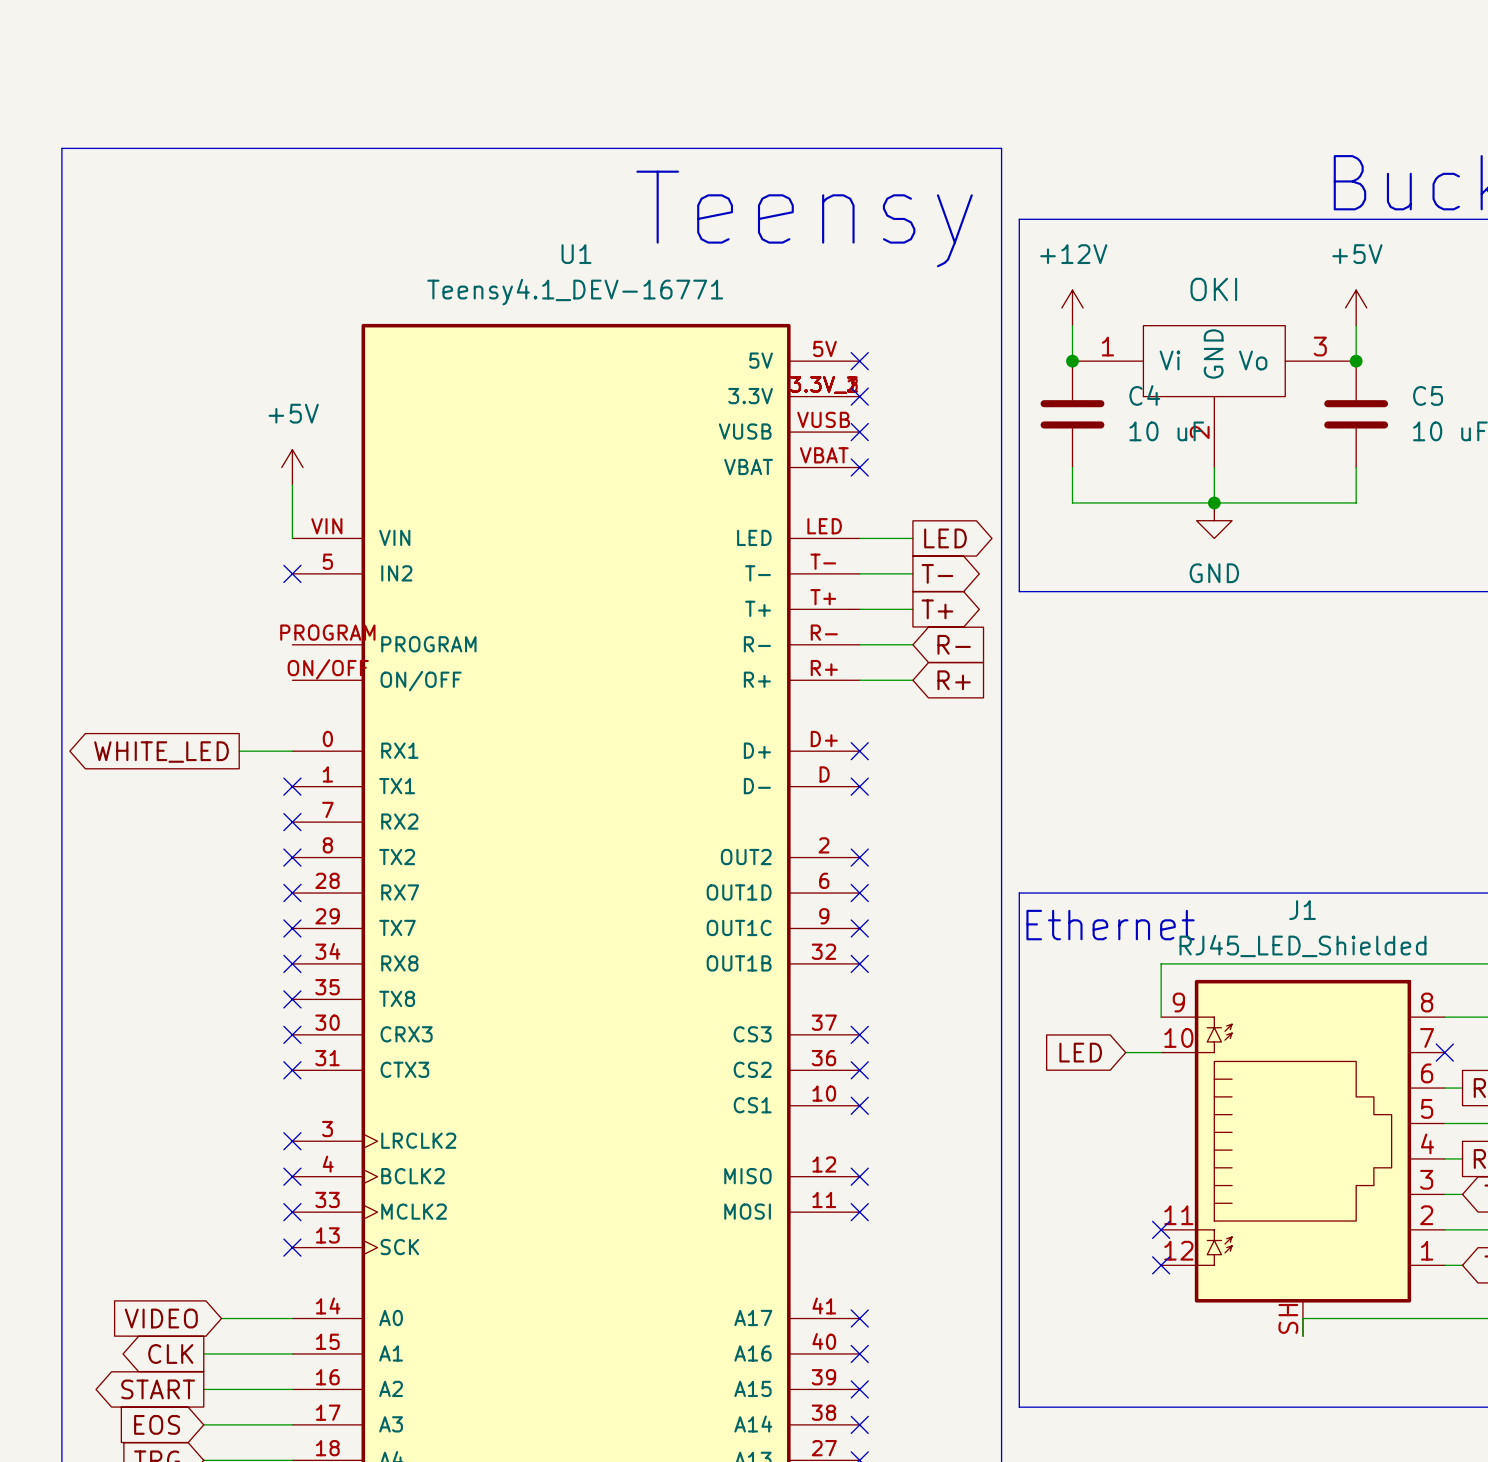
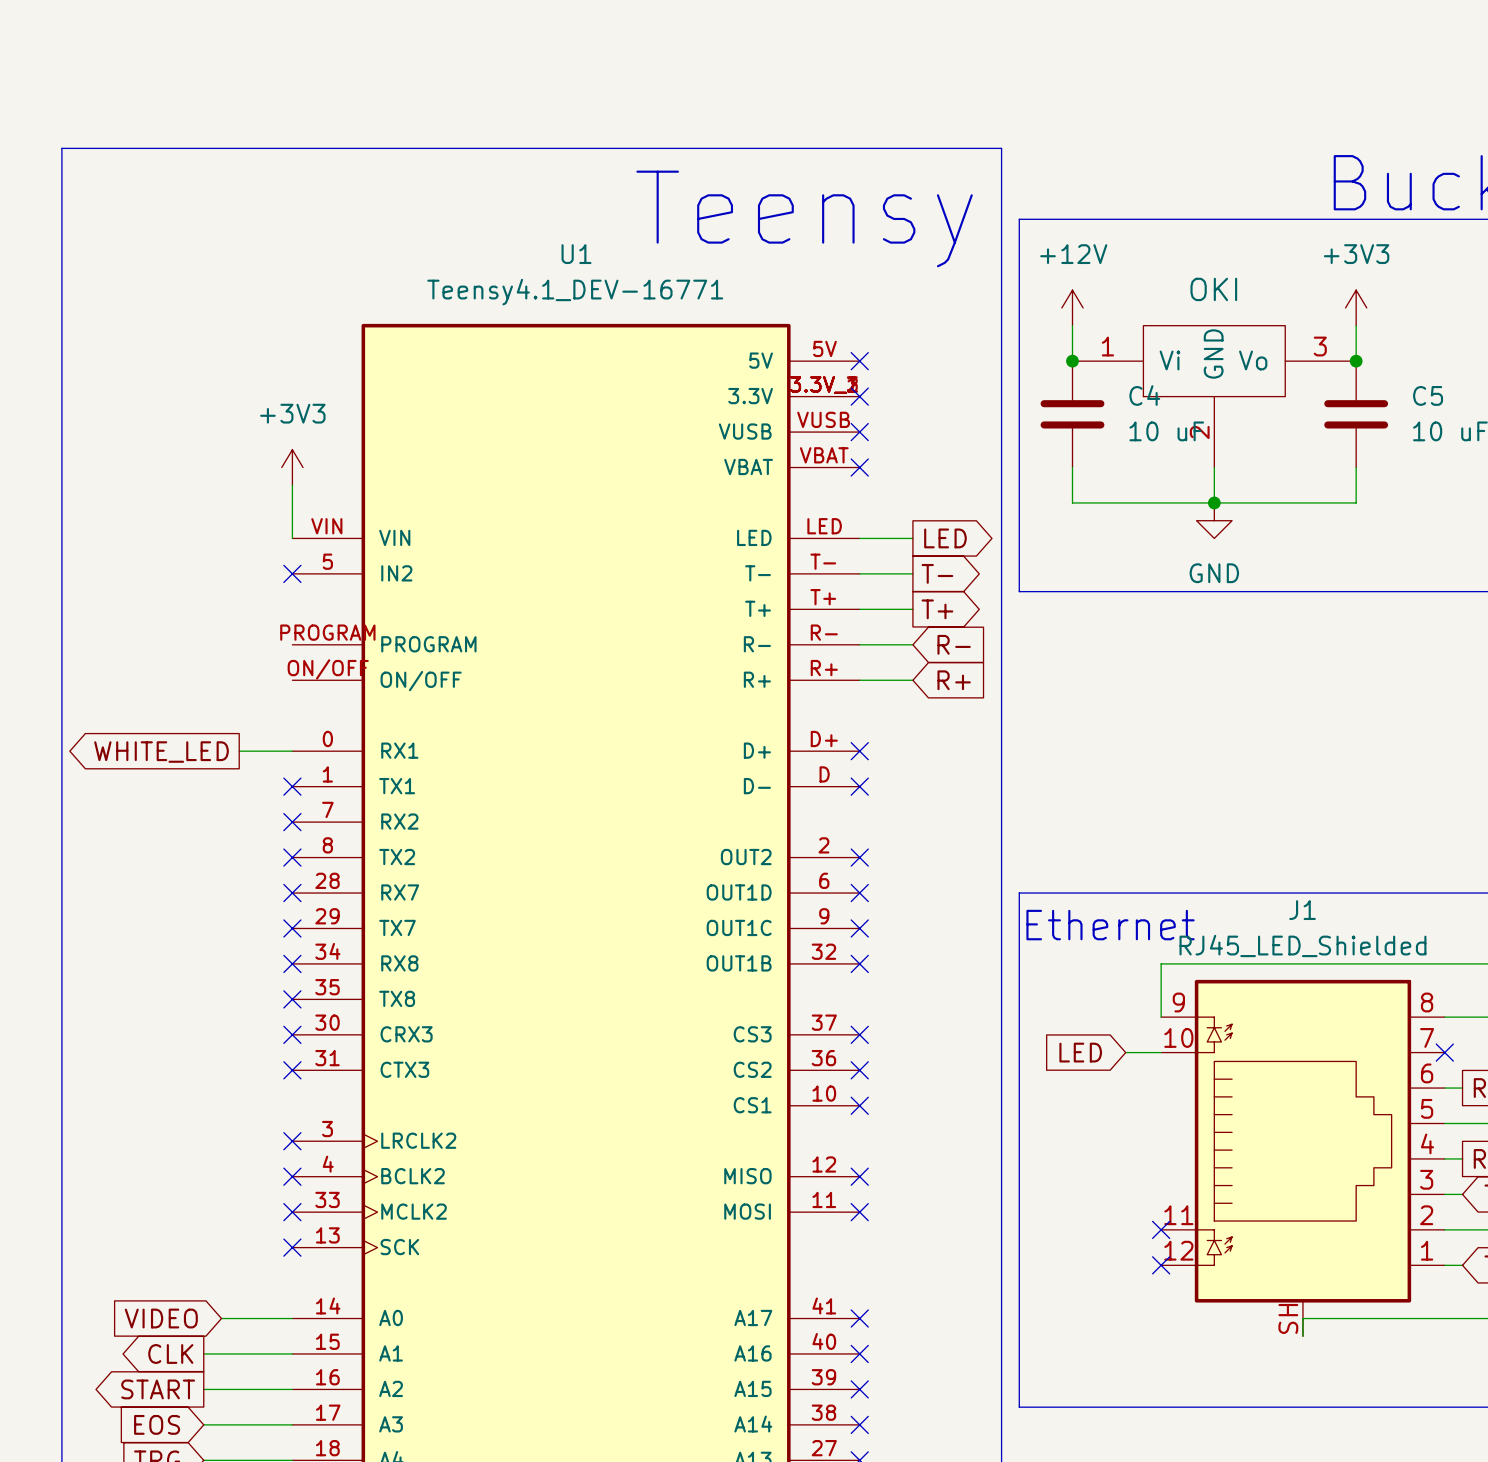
power symbol: +5V (1356, 307) -> +3V3 (1356, 307)
power symbol: +5V (292, 467) -> +3V3 (292, 467)

